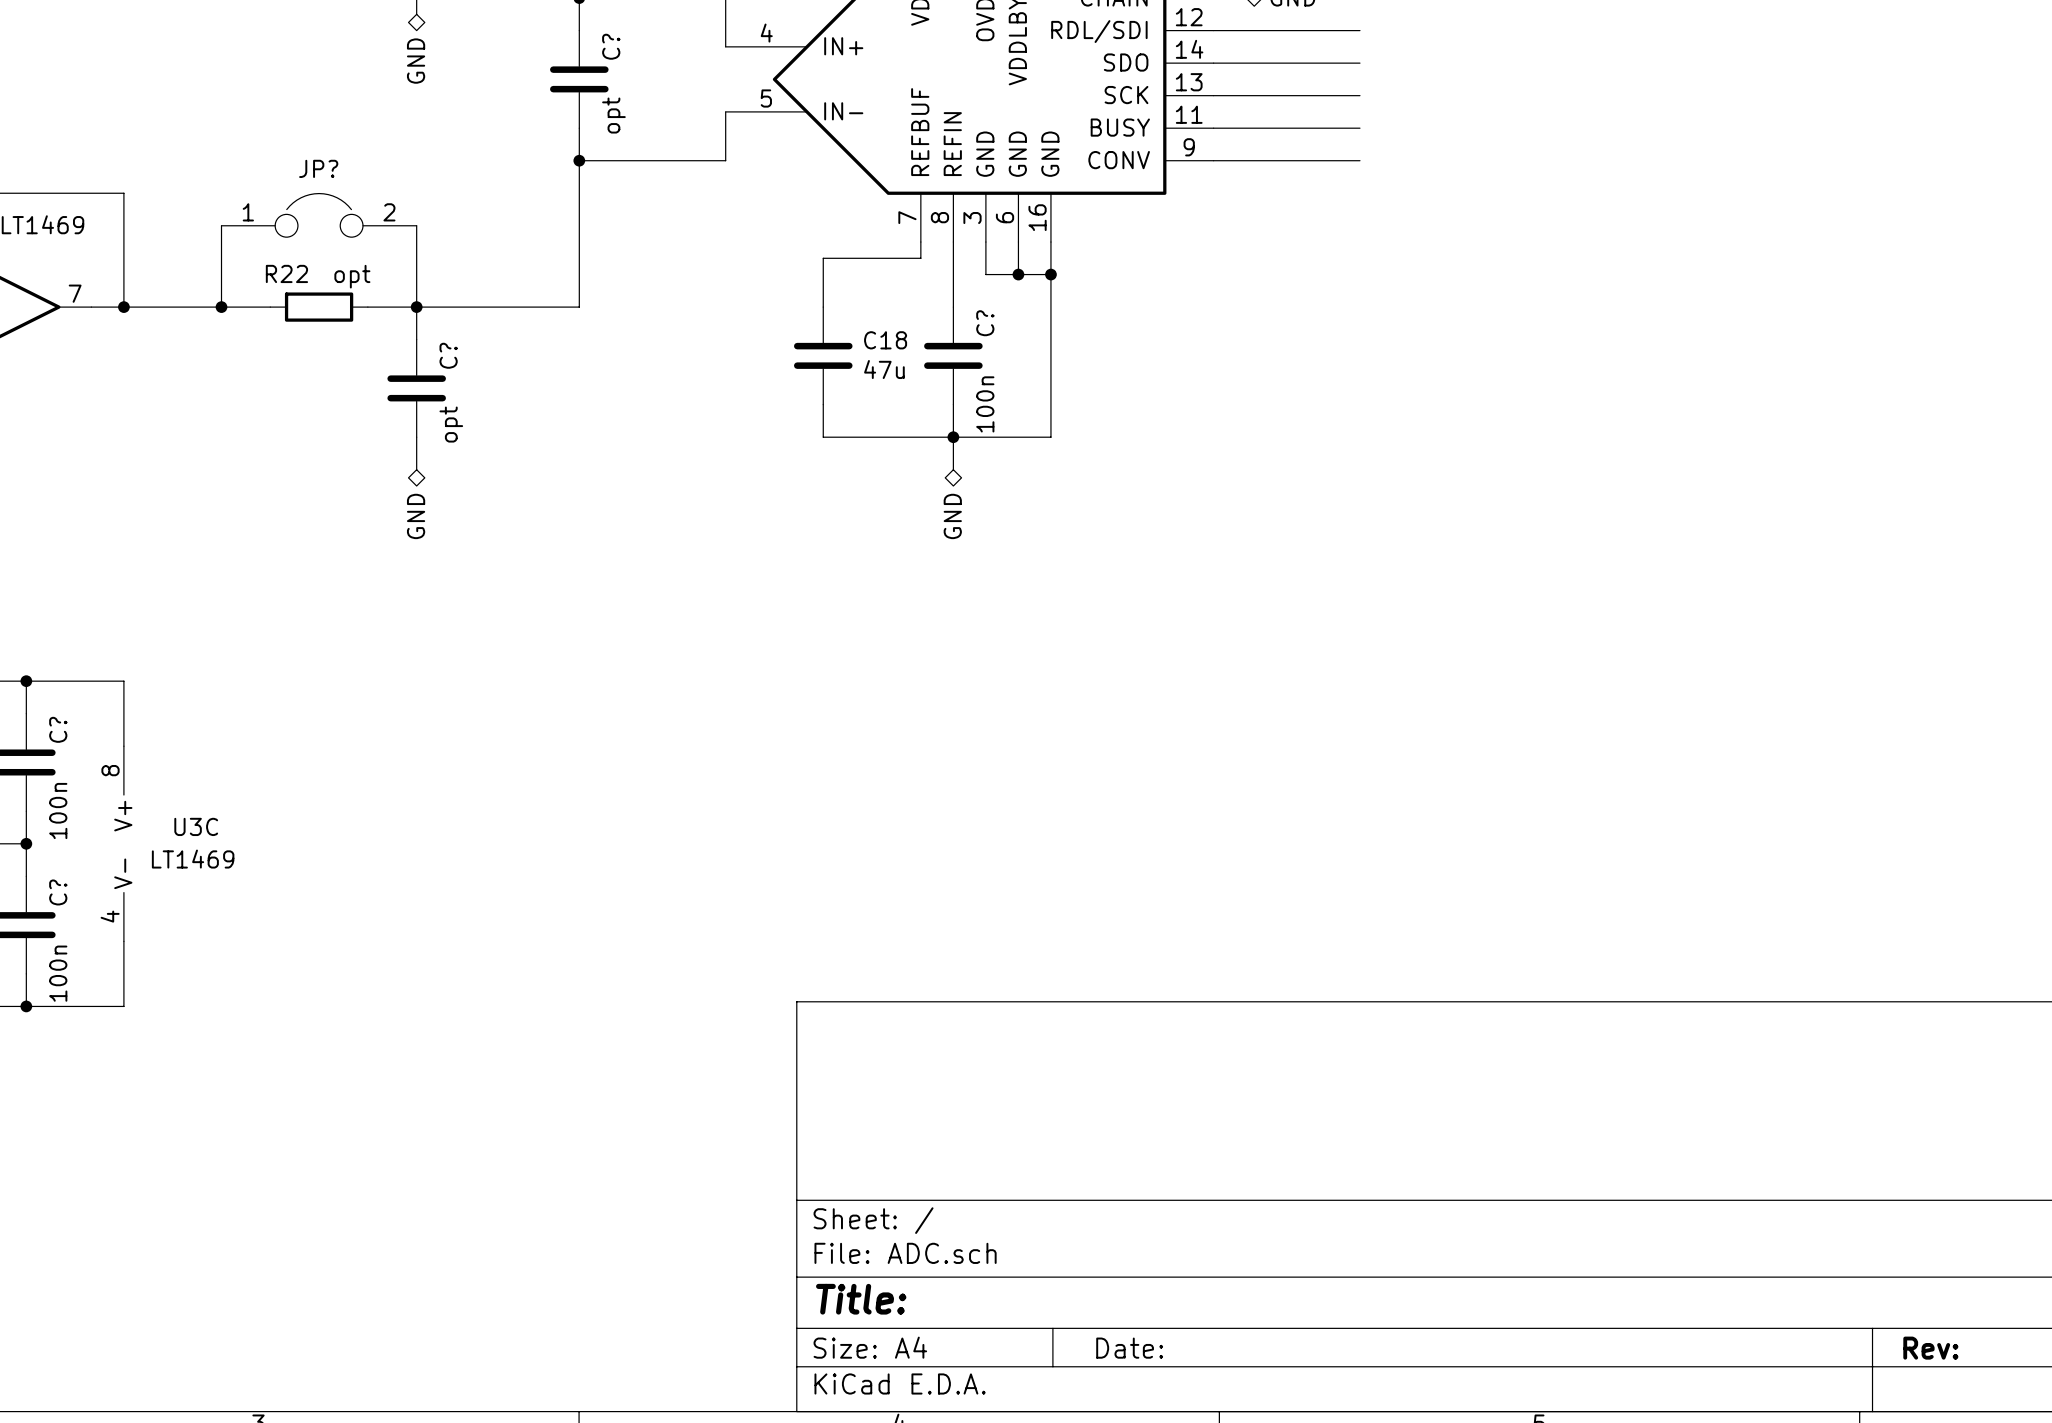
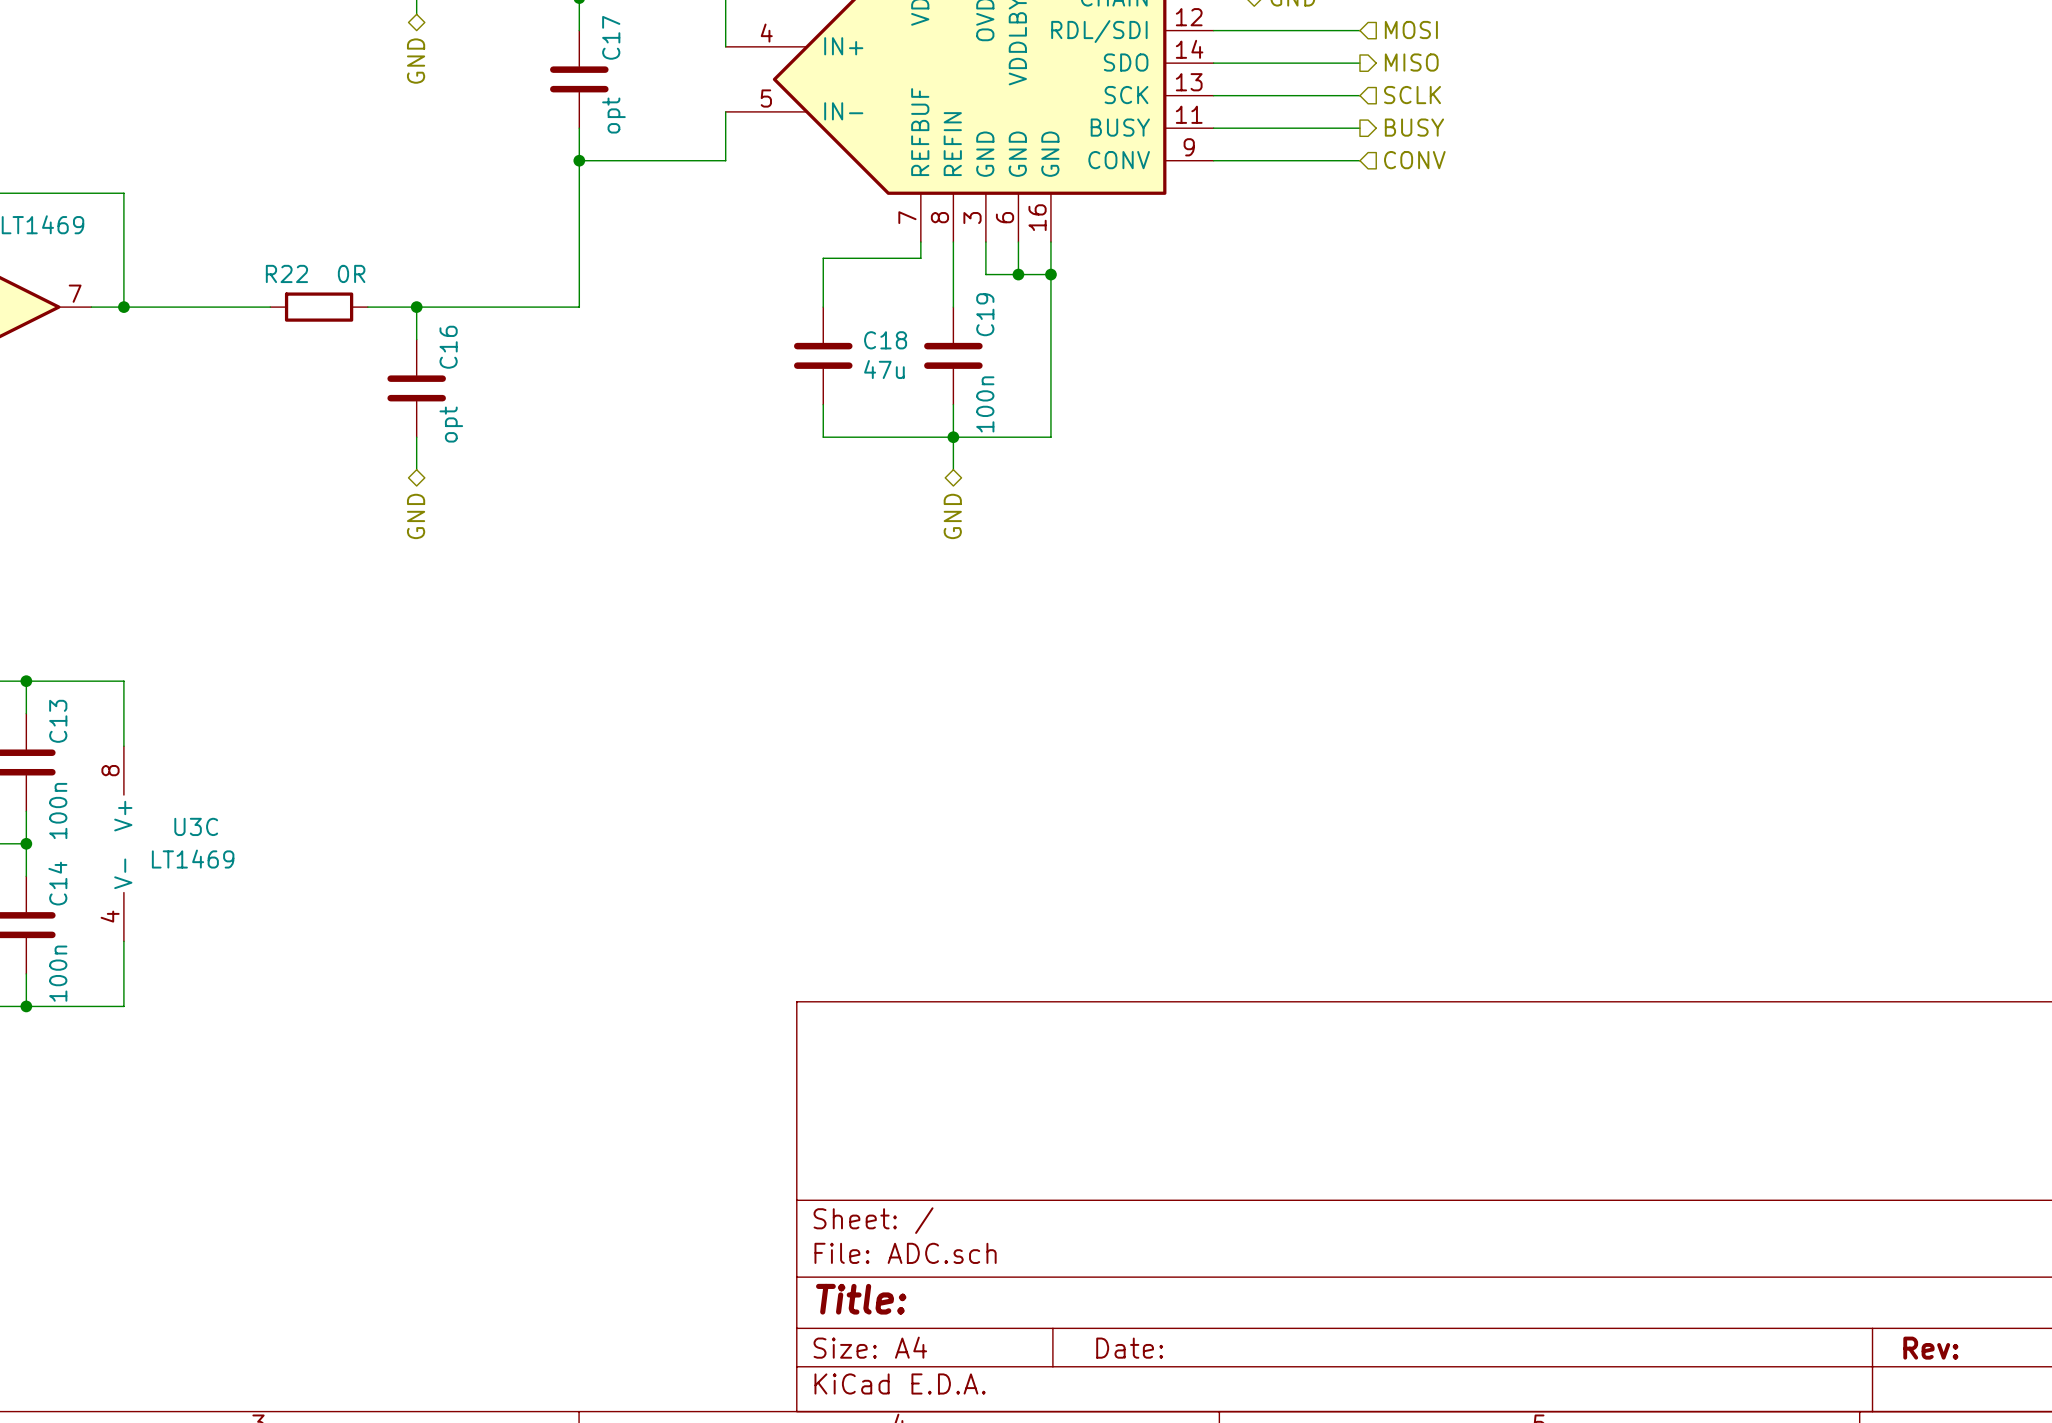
hierarchical label: none -> MOSI (1411, 29)
C? name: C? (611, 46) -> C17 (611, 37)
hierarchical label: none -> MISO (1411, 62)
hierarchical label: none -> SCLK (1412, 95)
hierarchical label: none -> BUSY (1414, 127)
hierarchical label: none -> CONV (1414, 160)
JP?: (319, 215) -> none
wire: (221, 225) (221, 307) -> none
wire: (416, 225) (416, 307) -> none
R22 value: opt (352, 276) -> 0R (351, 273)
junction: (221, 307) -> none
C? name: C? (985, 323) -> C19 (985, 314)
C? name: C? (448, 355) -> C16 (448, 347)
C? name: C? (58, 729) -> C13 (58, 721)
C? name: C? (58, 892) -> C14 (57, 883)

